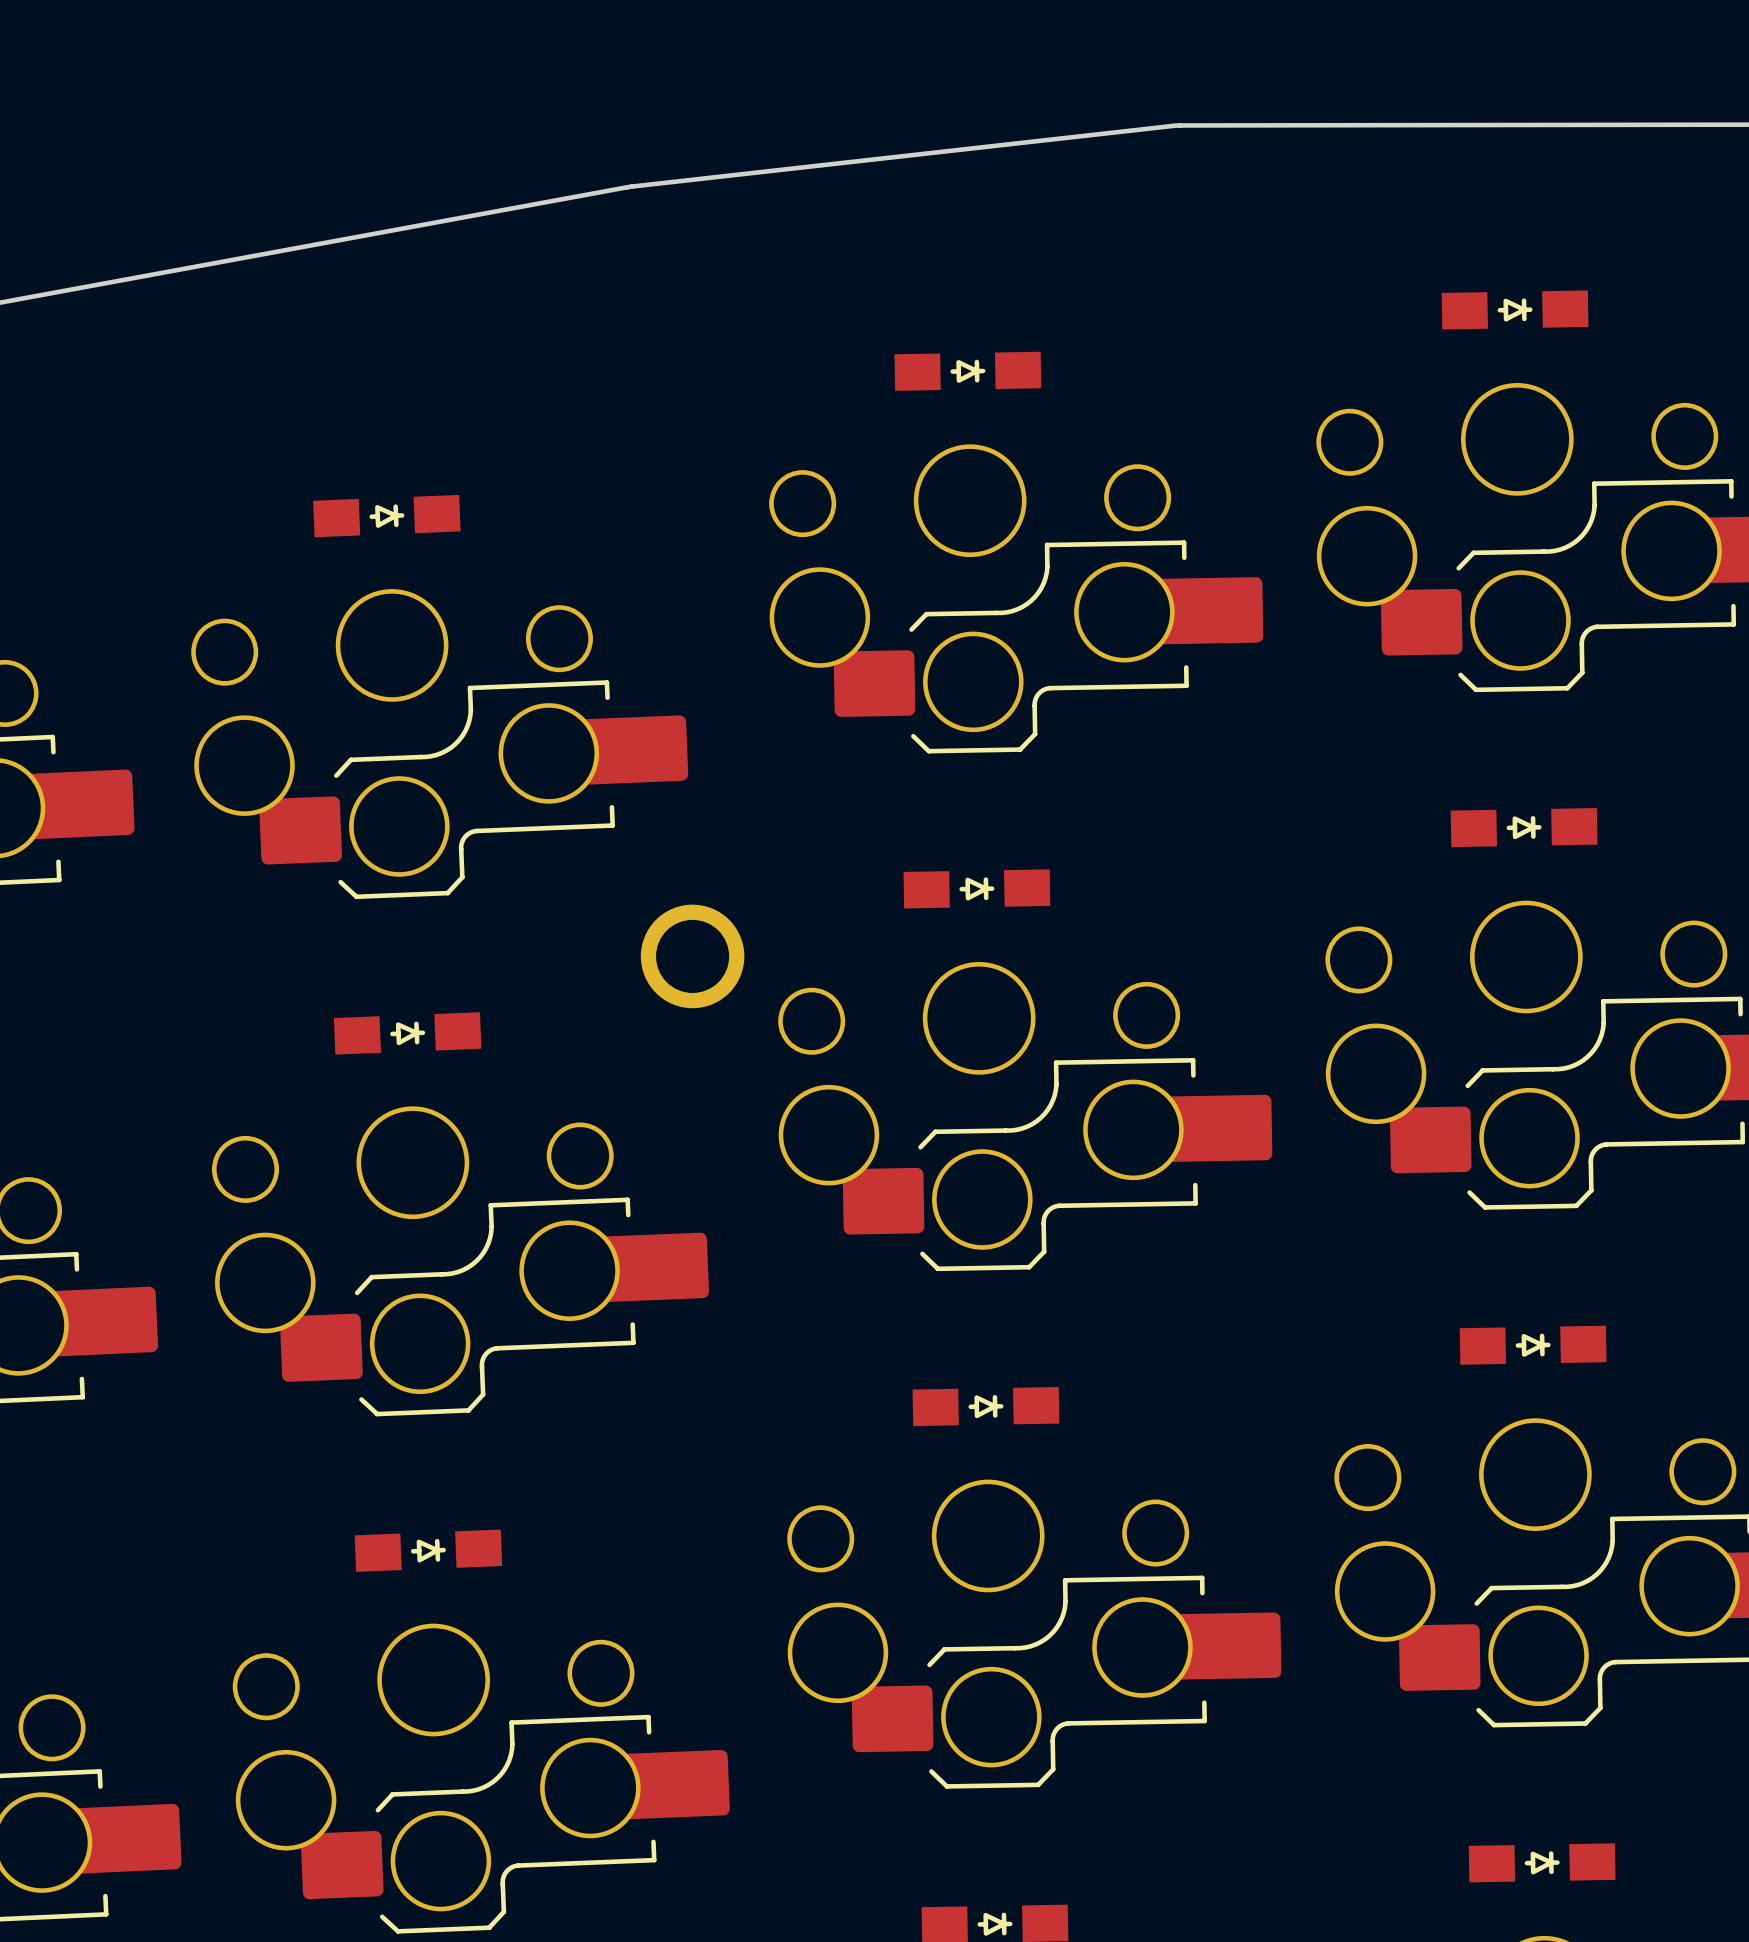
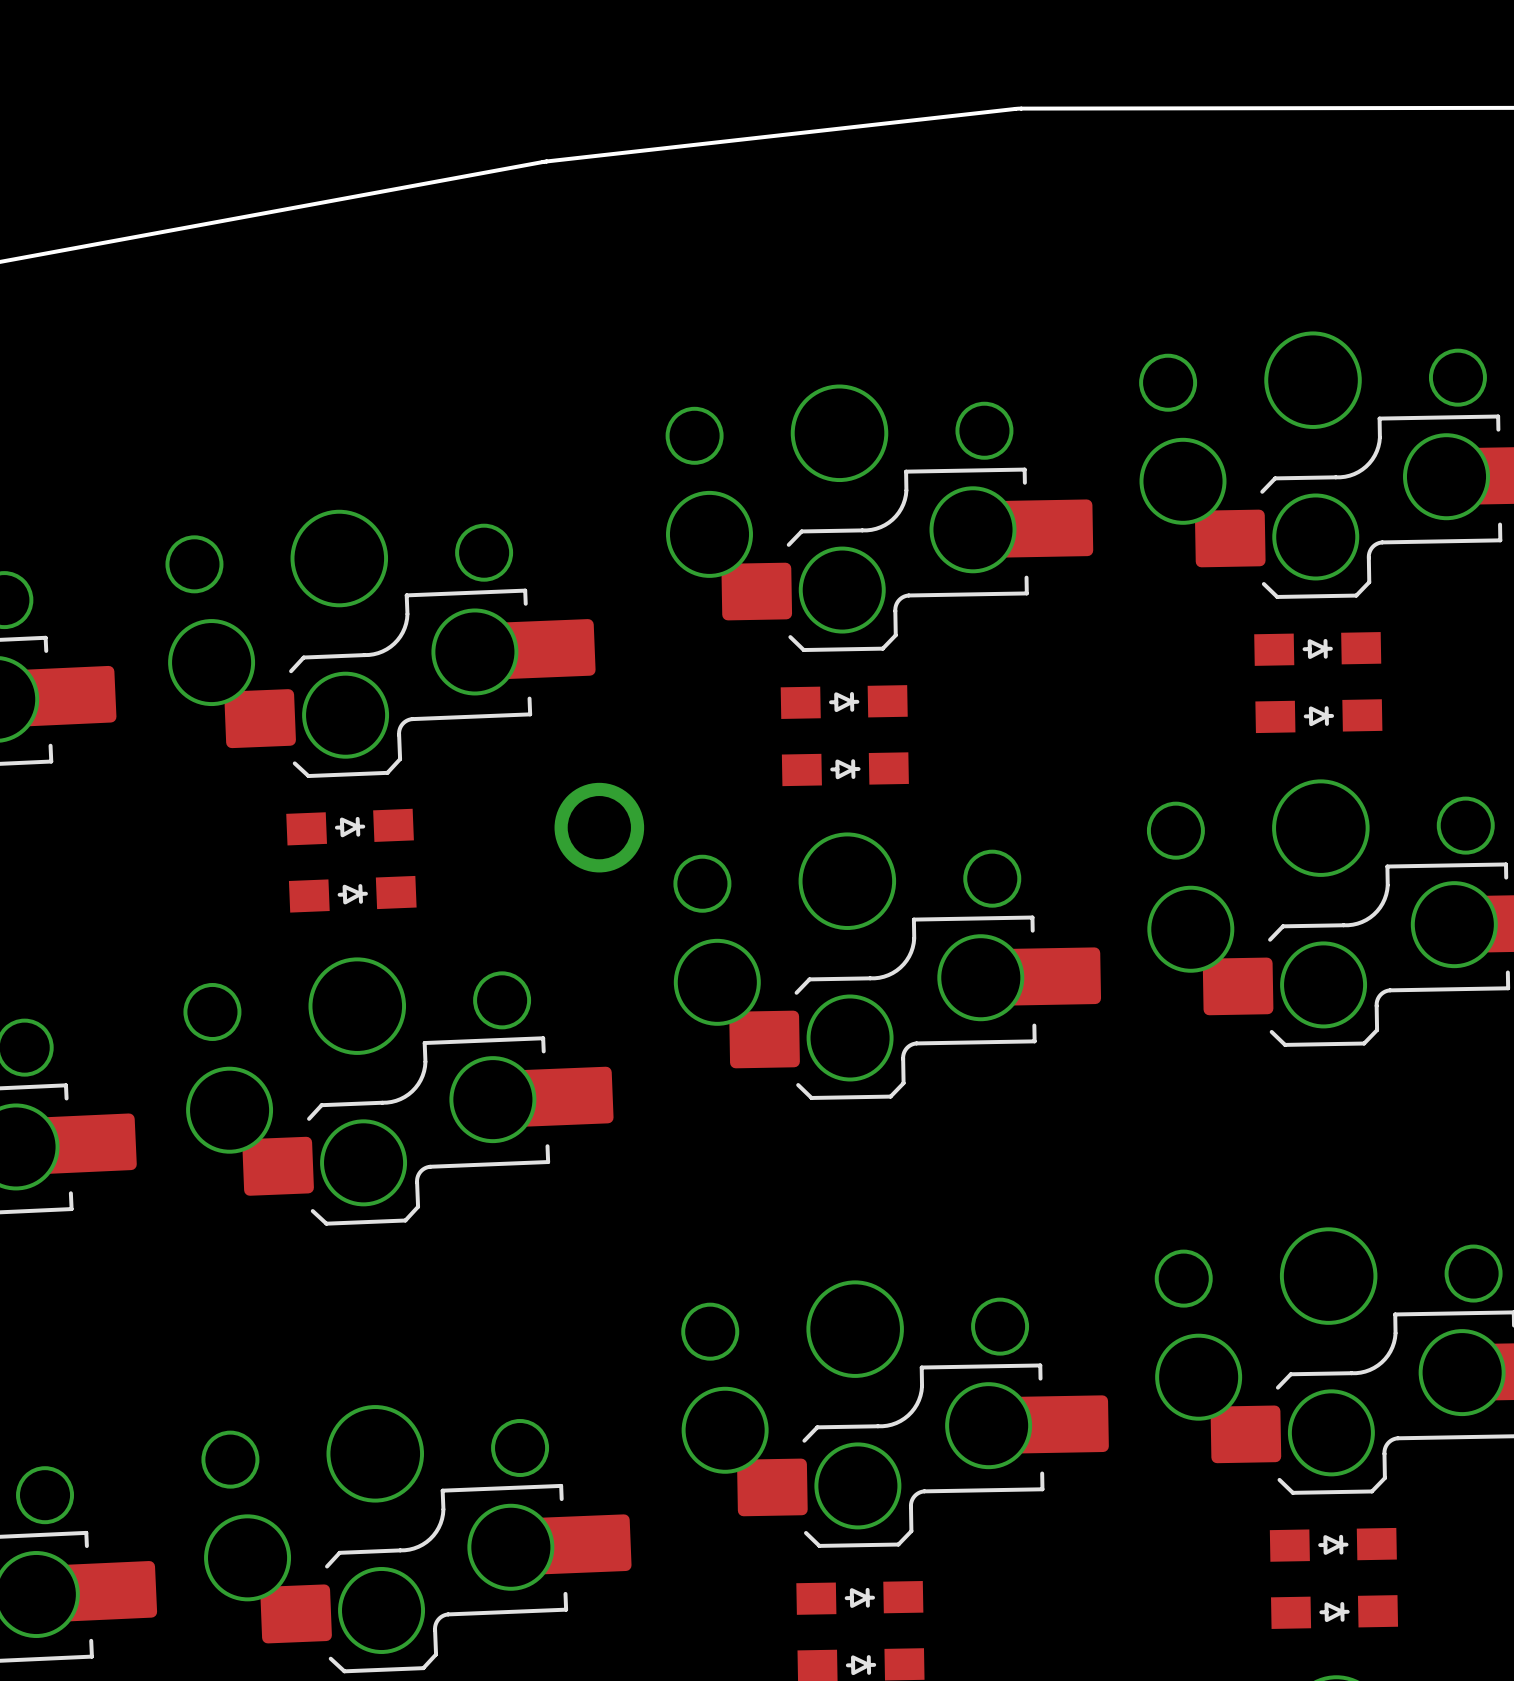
part: (1515, 309) -> none
part: (967, 371) -> none
part: (386, 516) -> none
part: none -> (1317, 648)
part: none -> (844, 702)
part: none -> (350, 827)
part: (1533, 1345) -> none
part: (985, 1406) -> none
part: (428, 1550) -> none
part: none -> (1333, 1544)
part: none -> (859, 1597)

